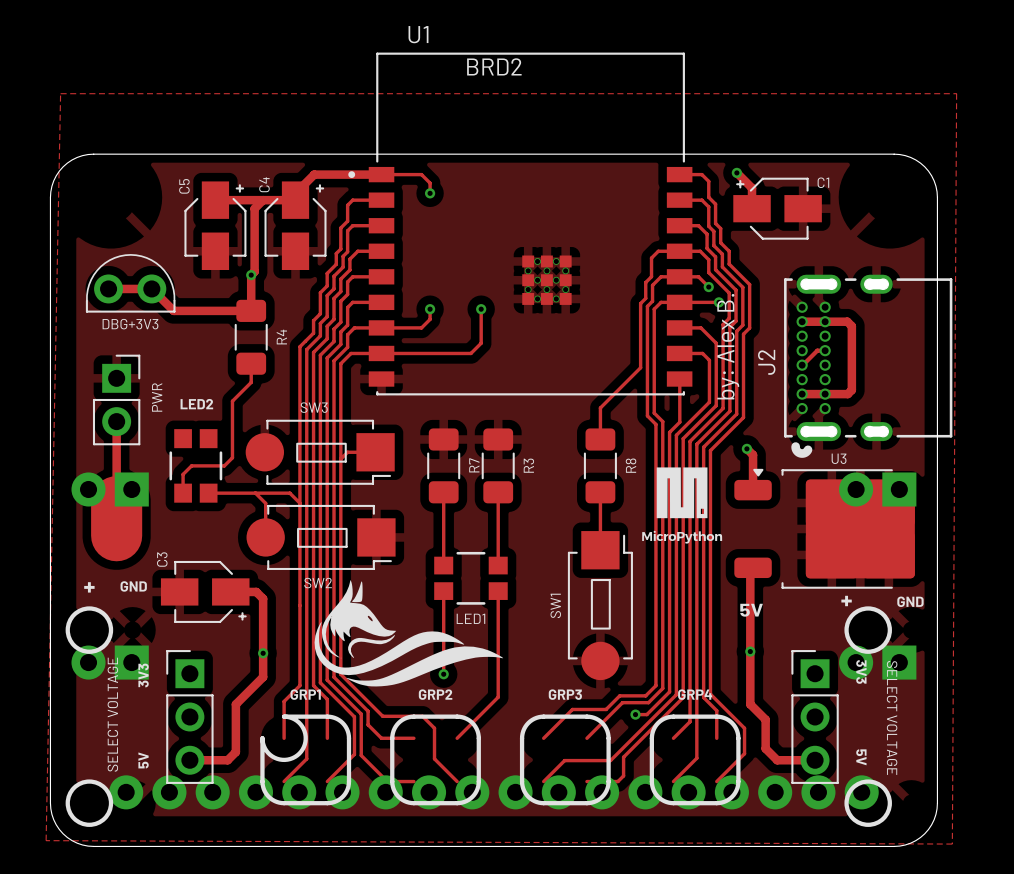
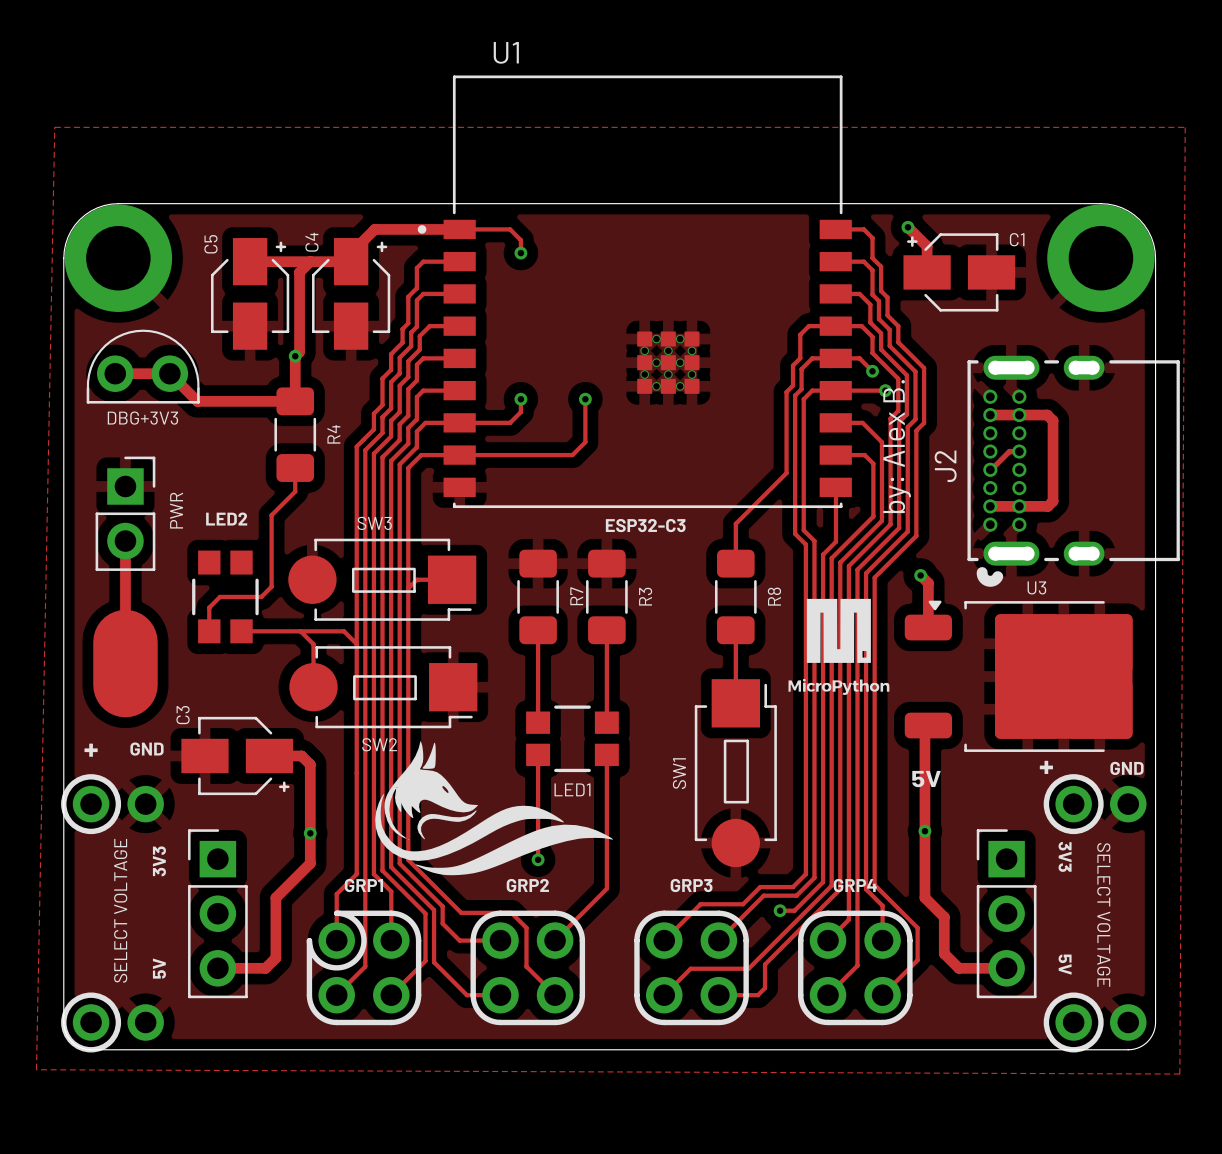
ESP32-C3: none -> (609, 626)
BRD2: (493, 500) -> none

